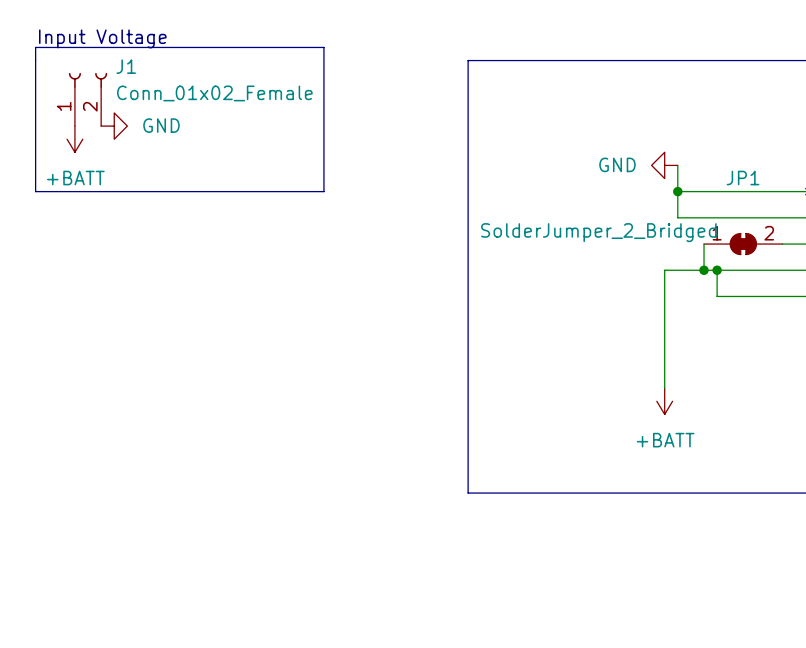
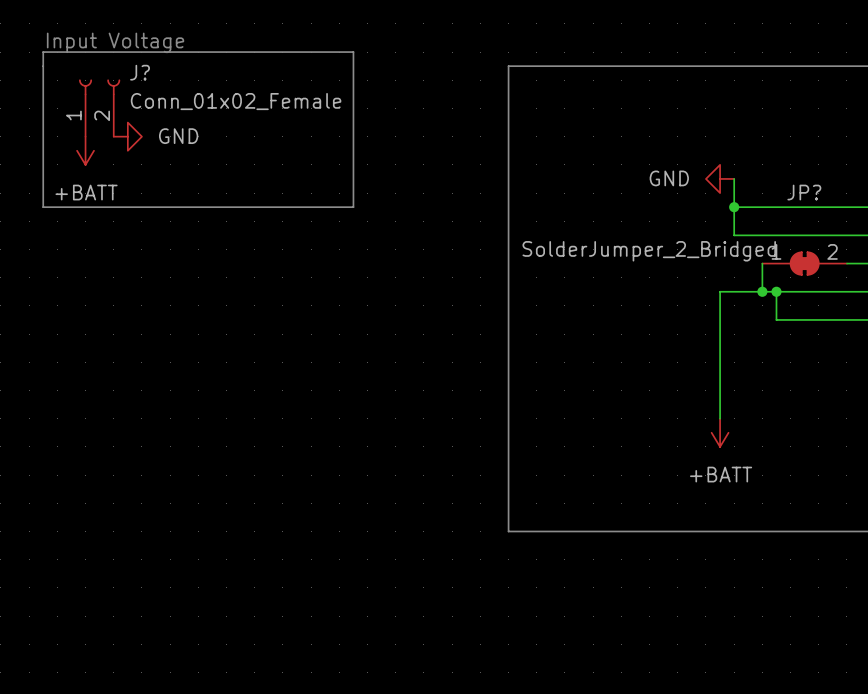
J1 name: J1 (126, 66) -> J? (140, 72)
JP1 name: JP1 (743, 178) -> JP? (804, 192)

